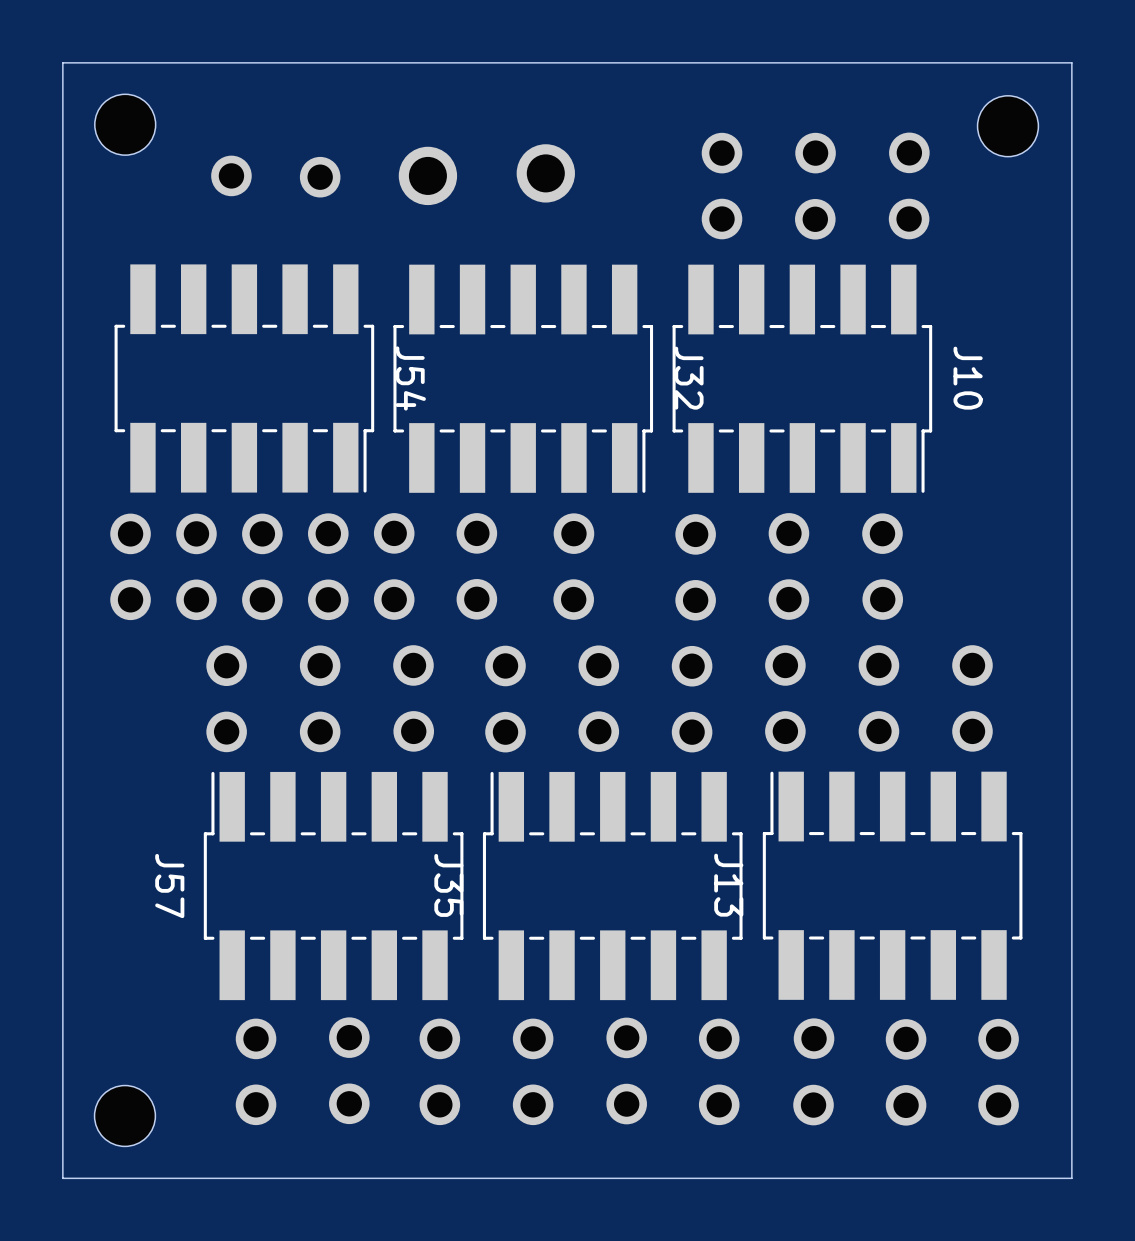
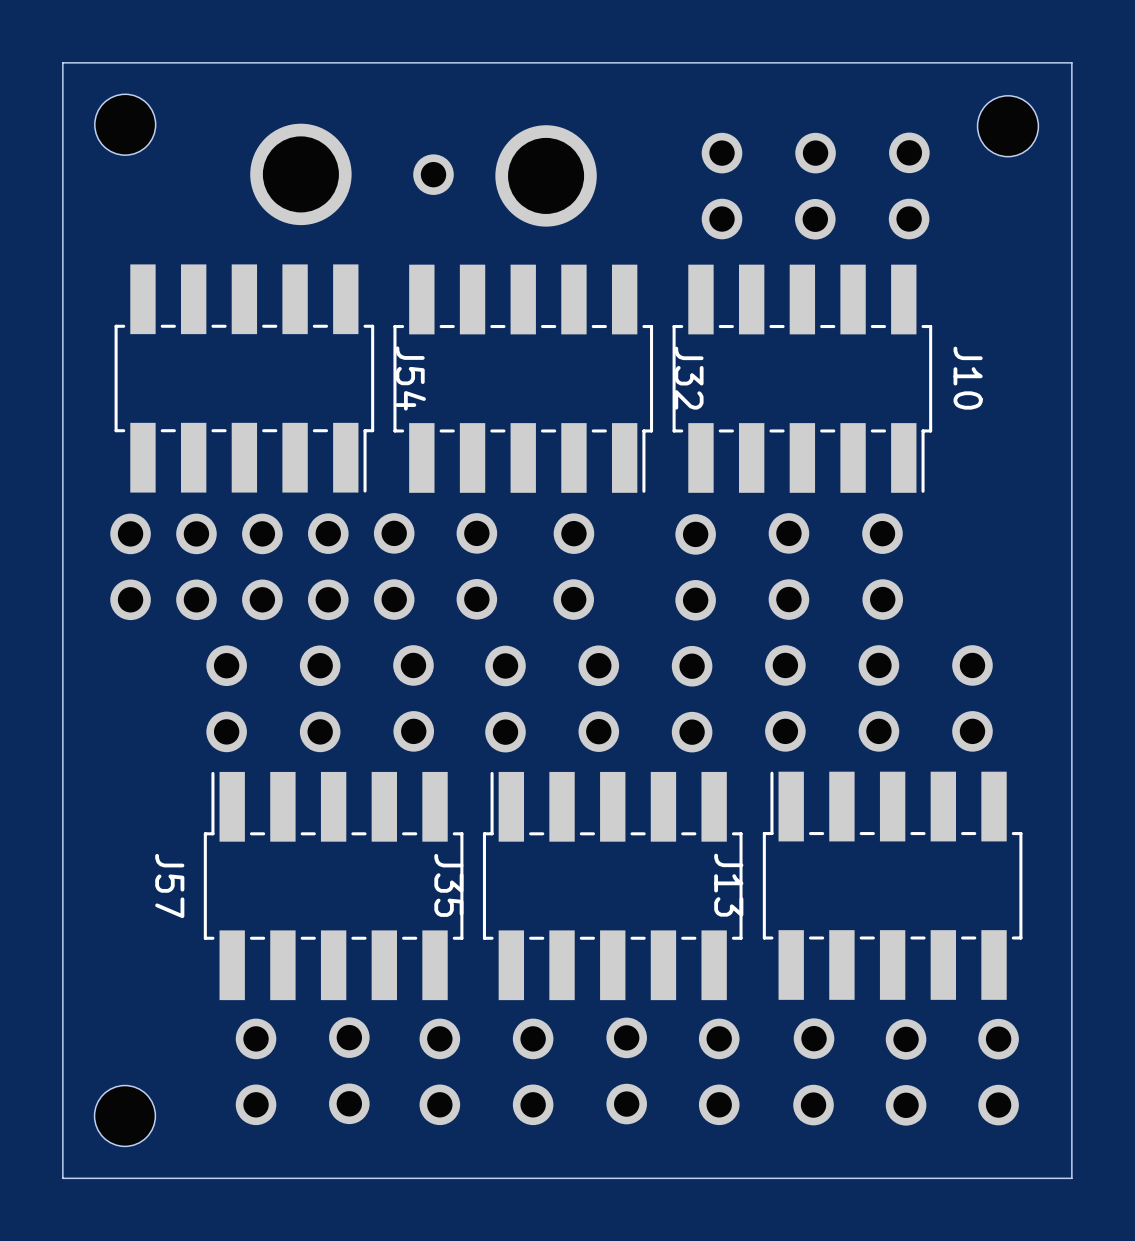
part footprint: [516, 144, 575, 203] -> [495, 125, 597, 227]
part footprint: [398, 146, 458, 206] -> [413, 154, 454, 195]
part footprint: [299, 156, 341, 198] -> [250, 123, 352, 226]
part: (231, 175) -> none

